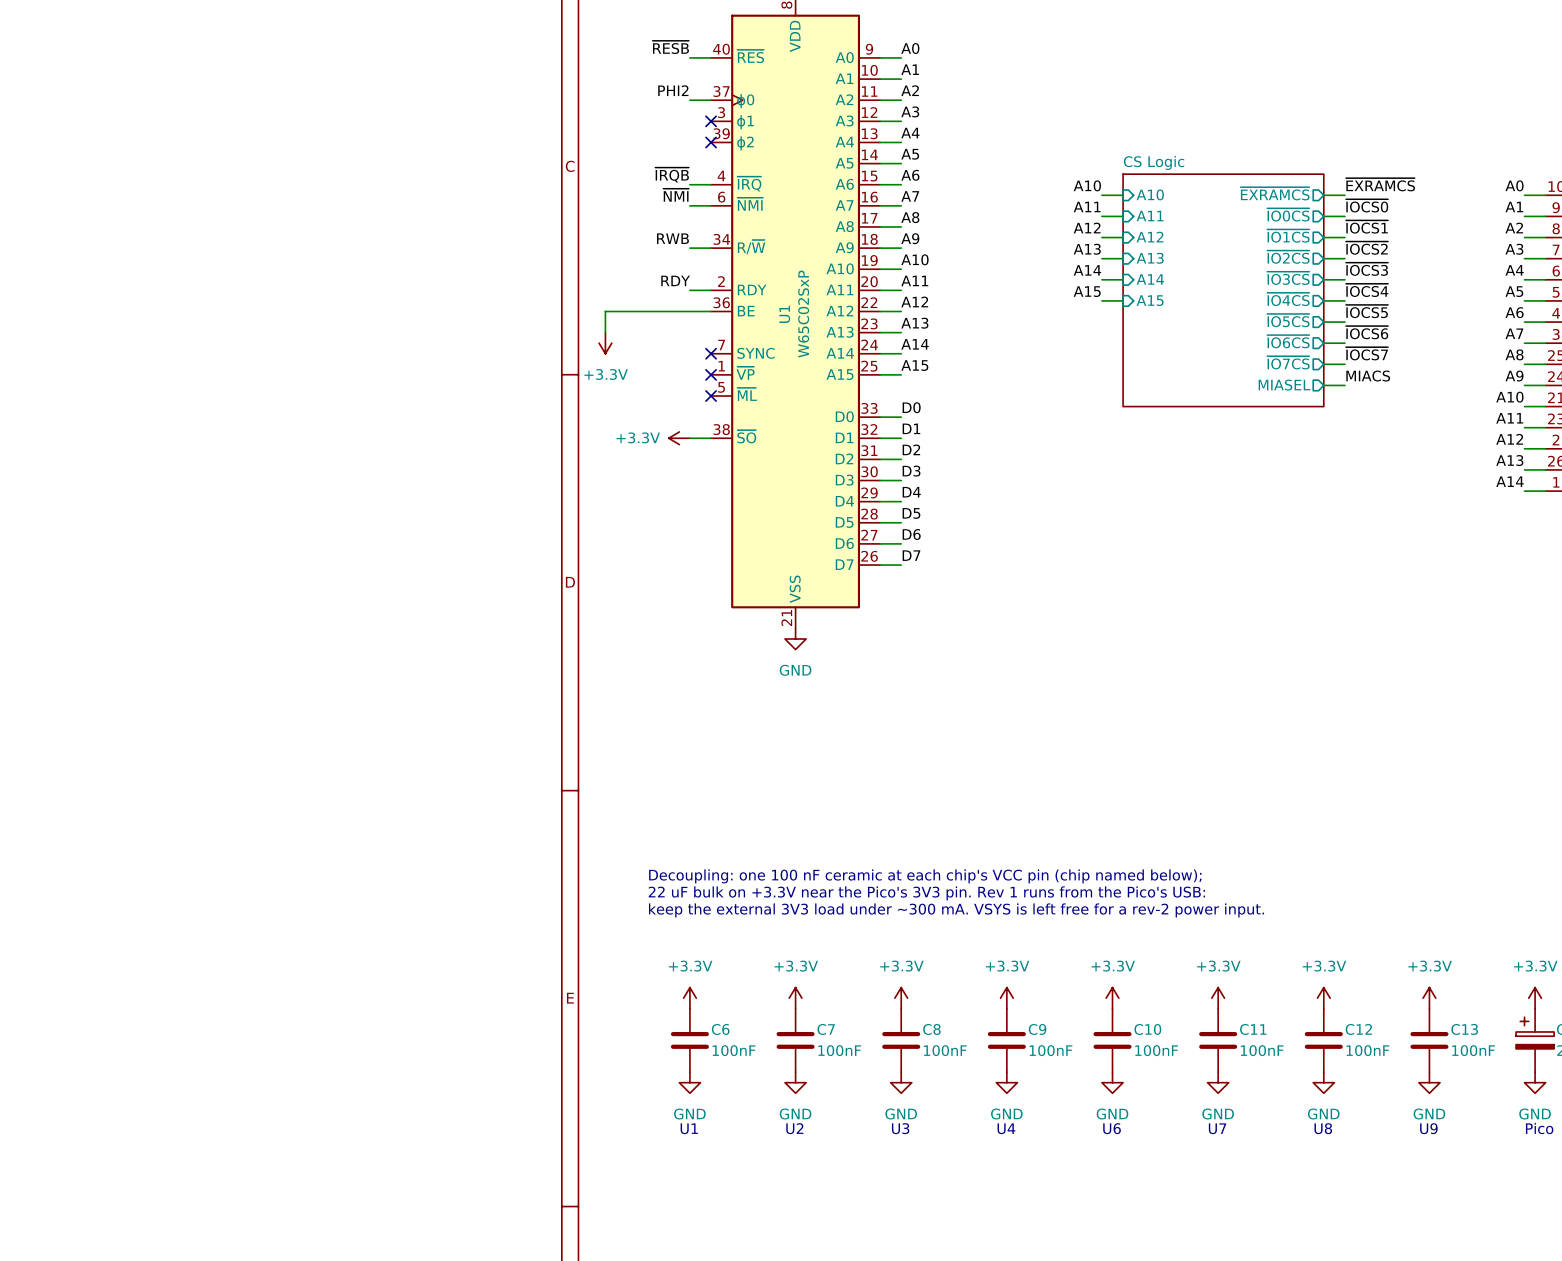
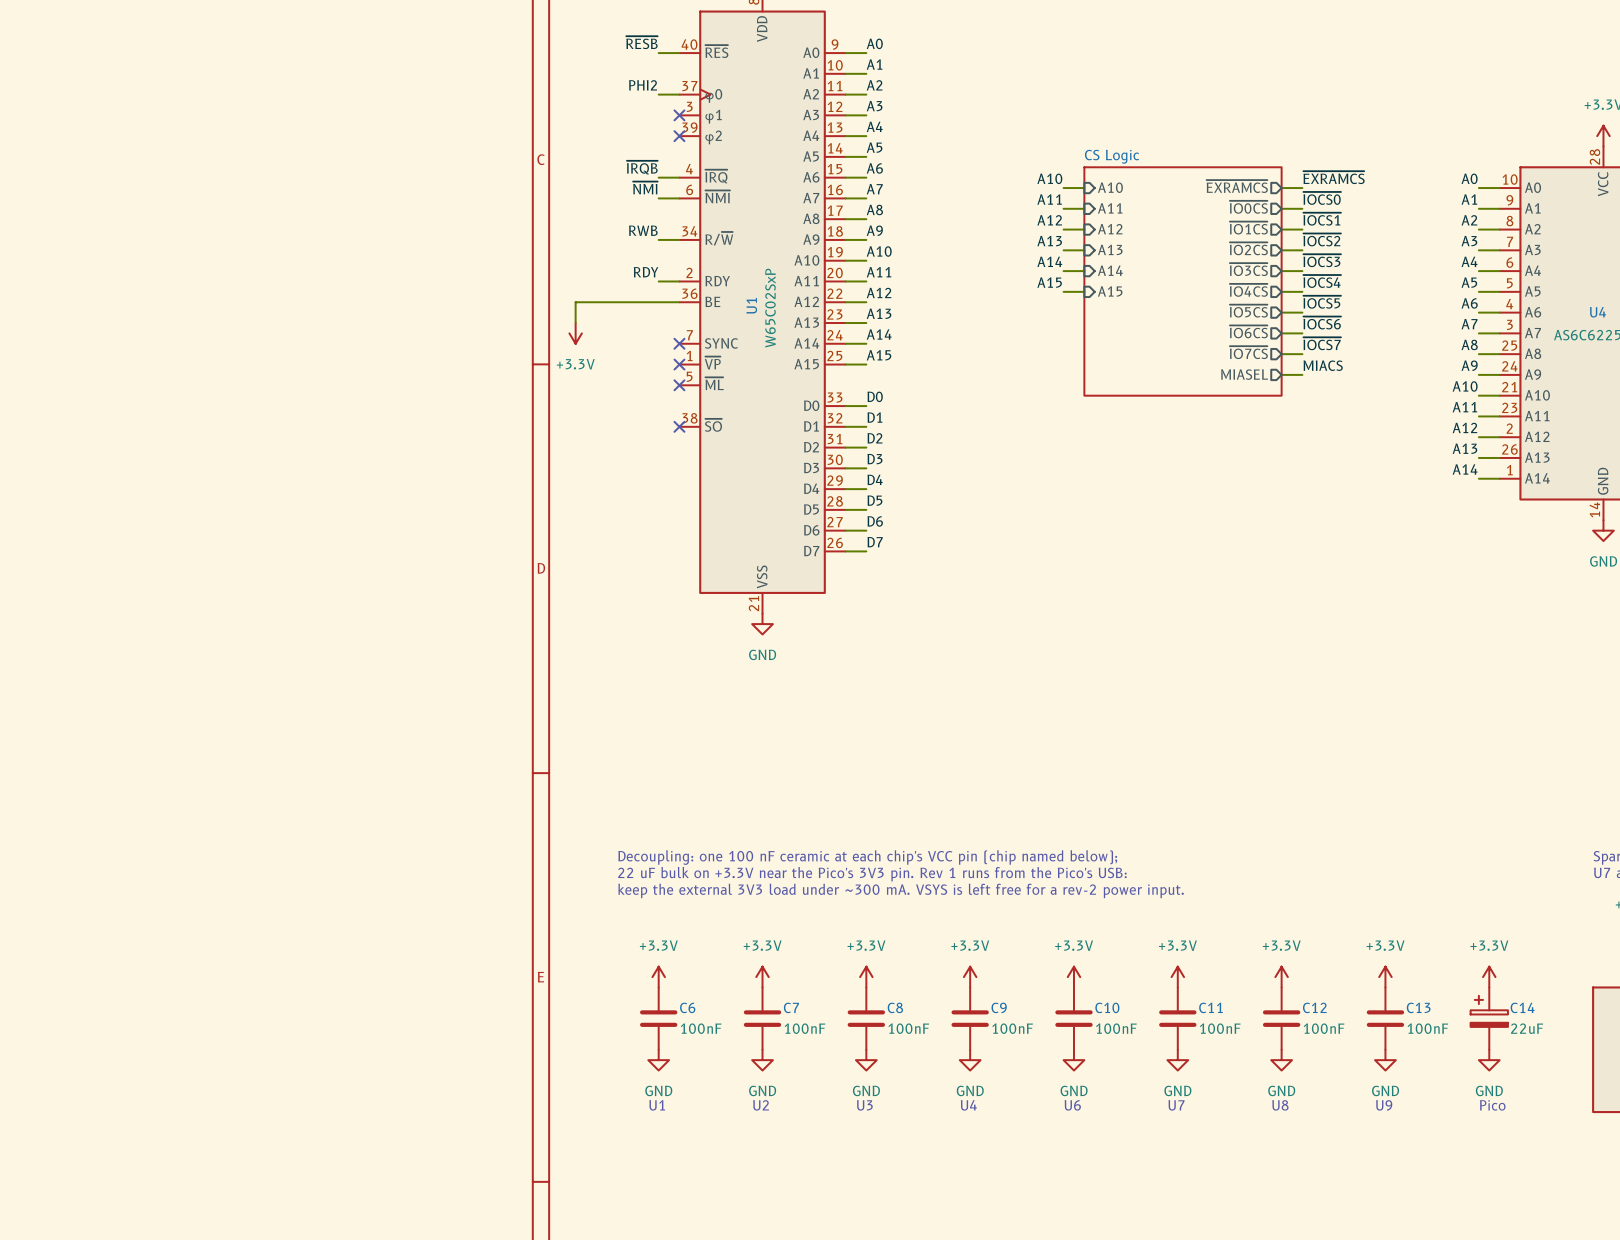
power symbol: +3.3V (679, 438) -> none
wire: (689, 438) (711, 438) -> none
no-connect mark: none -> (679, 426)

